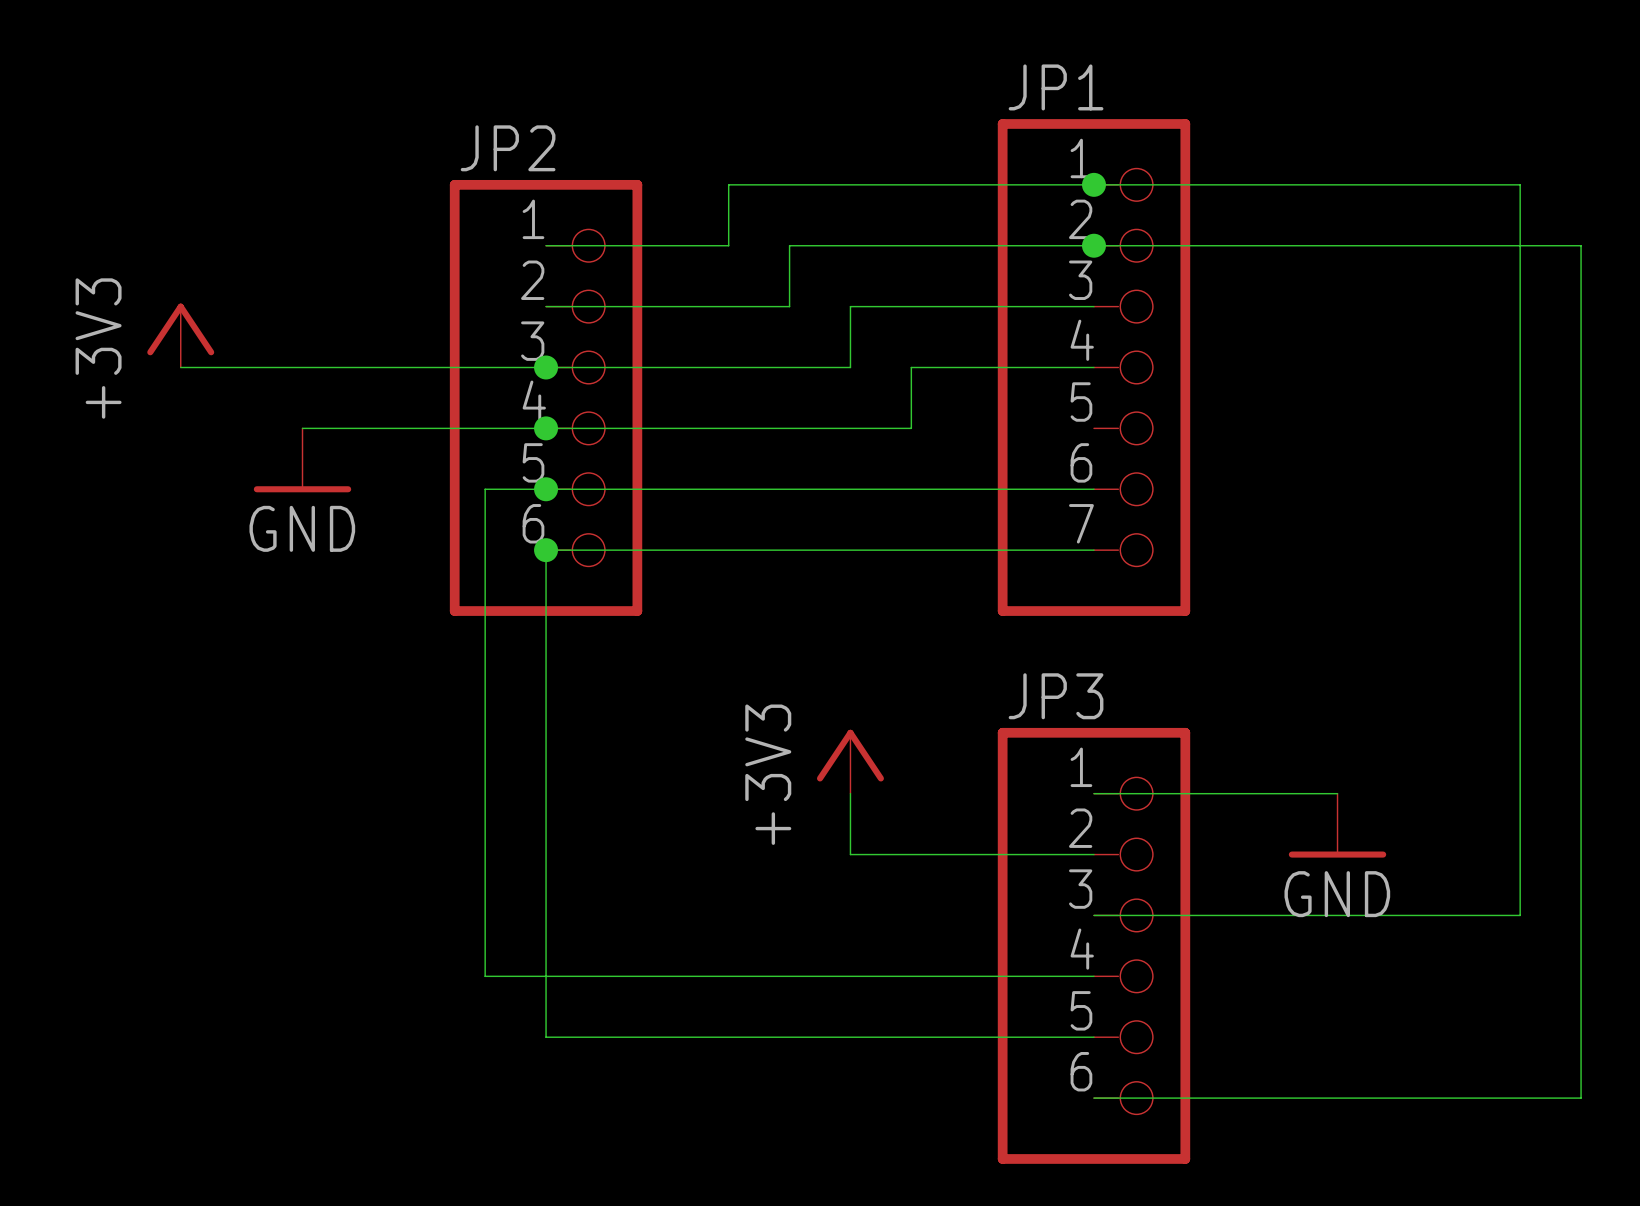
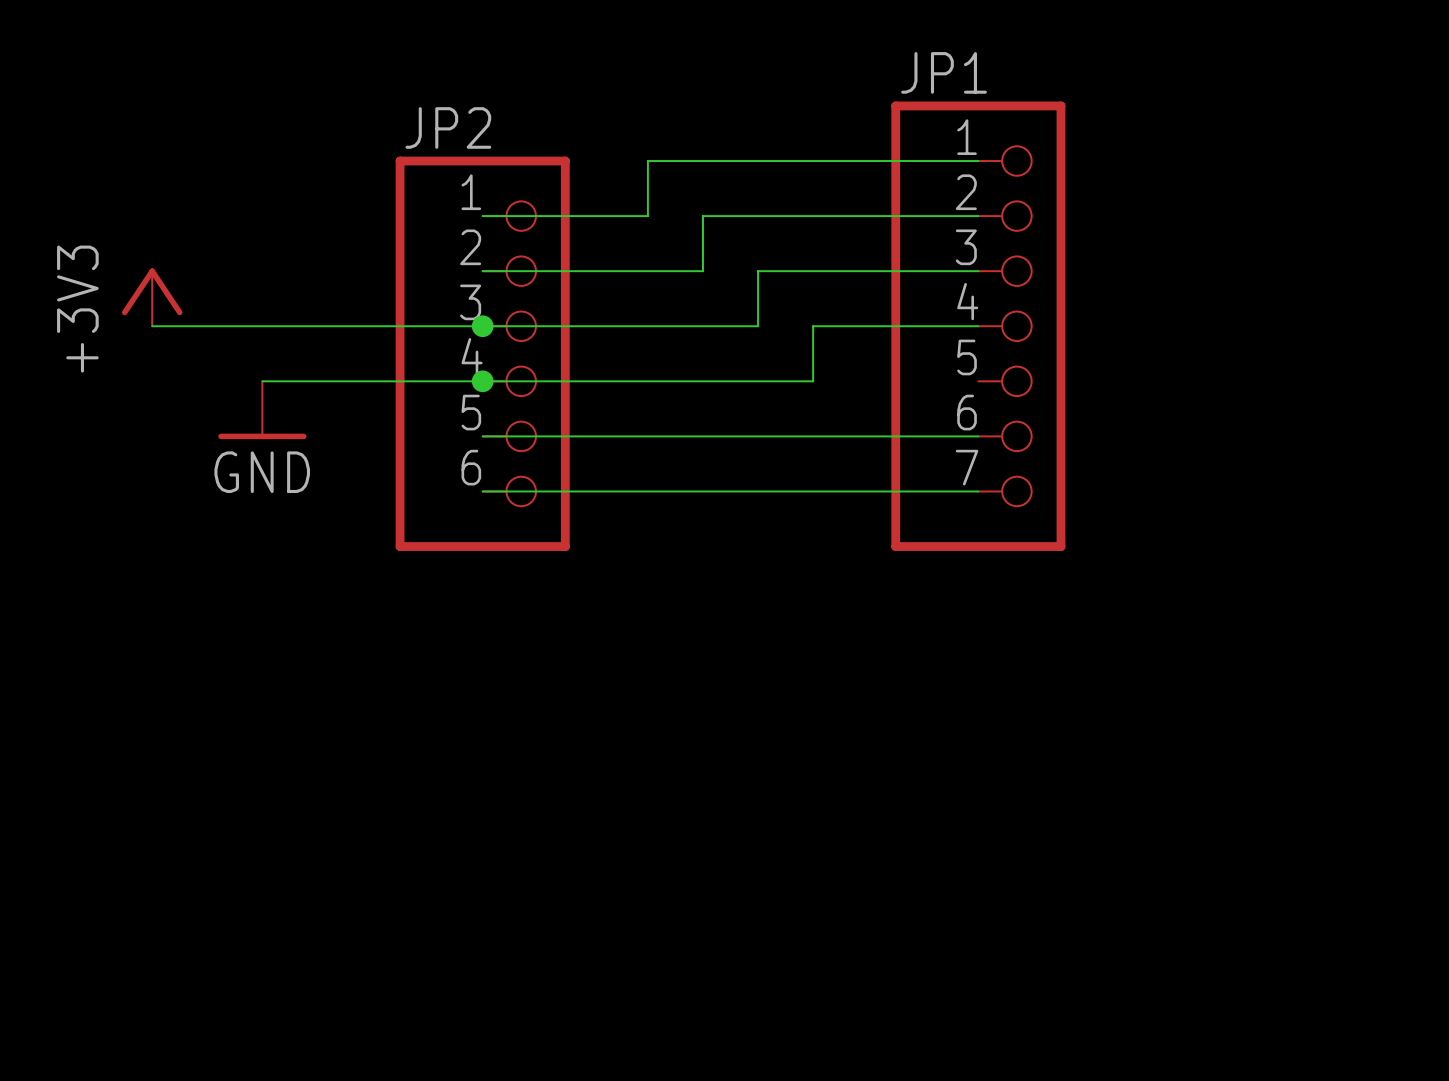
wire: (1093, 184) (1520, 184) (1520, 915) (1093, 915) -> none
junction: (1093, 184) -> none
wire: (1093, 245) (1581, 245) (1581, 1098) (1093, 1098) -> none
junction: (1093, 245) -> none
wire: (546, 489) (485, 489) (485, 976) (1093, 976) -> none
junction: (546, 489) -> none
wire: (546, 550) (546, 1037) (1093, 1037) -> none
junction: (546, 550) -> none
power symbol: +3V3 (850, 761) -> none
wire: (850, 793) (850, 854) (1093, 854) -> none
wire: (1093, 793) (1337, 793) -> none
power symbol: GND (1337, 825) -> none
JP3: (1093, 945) -> none

